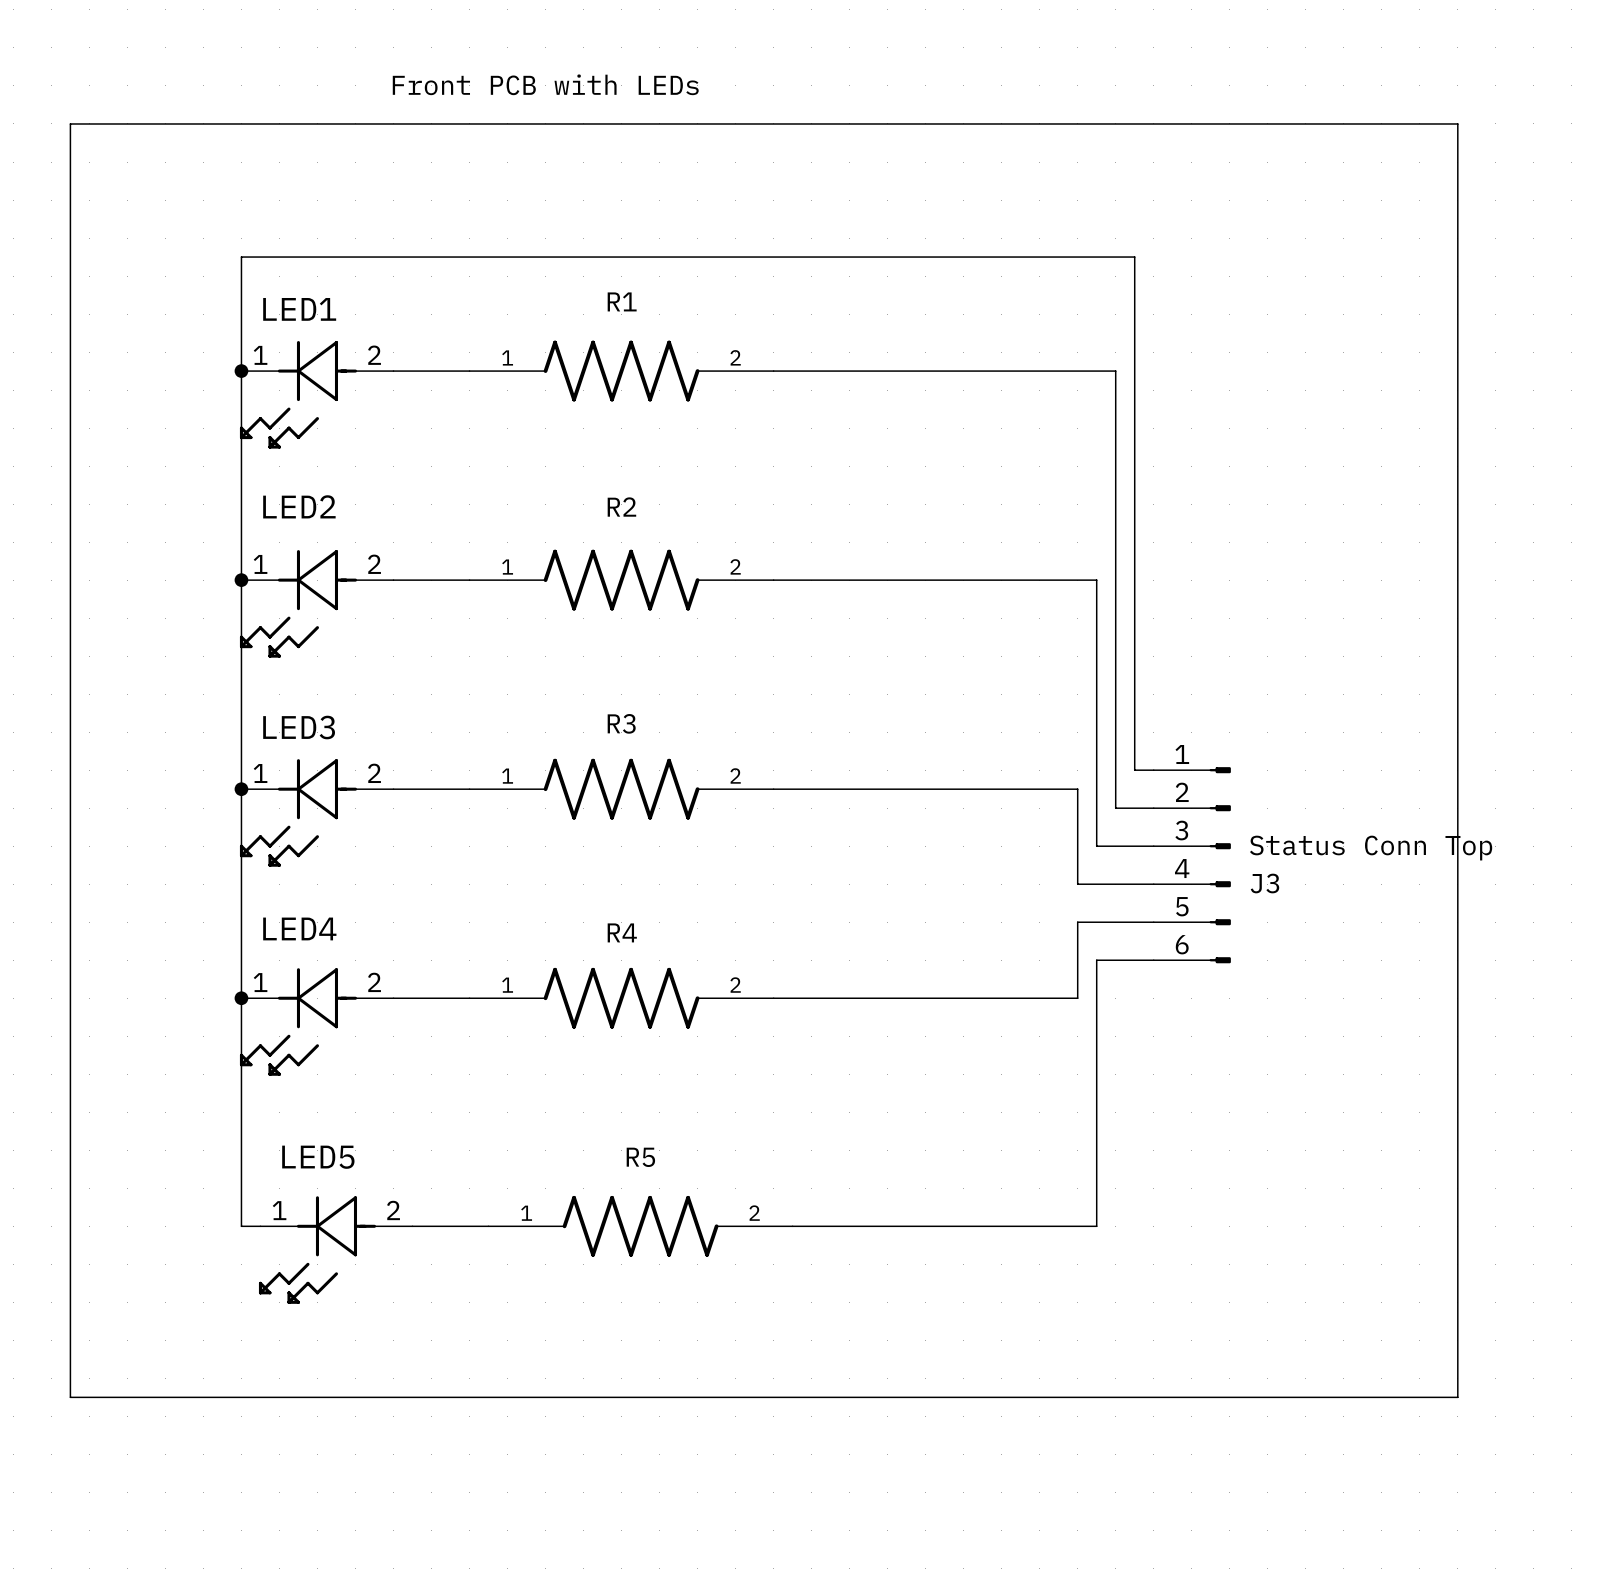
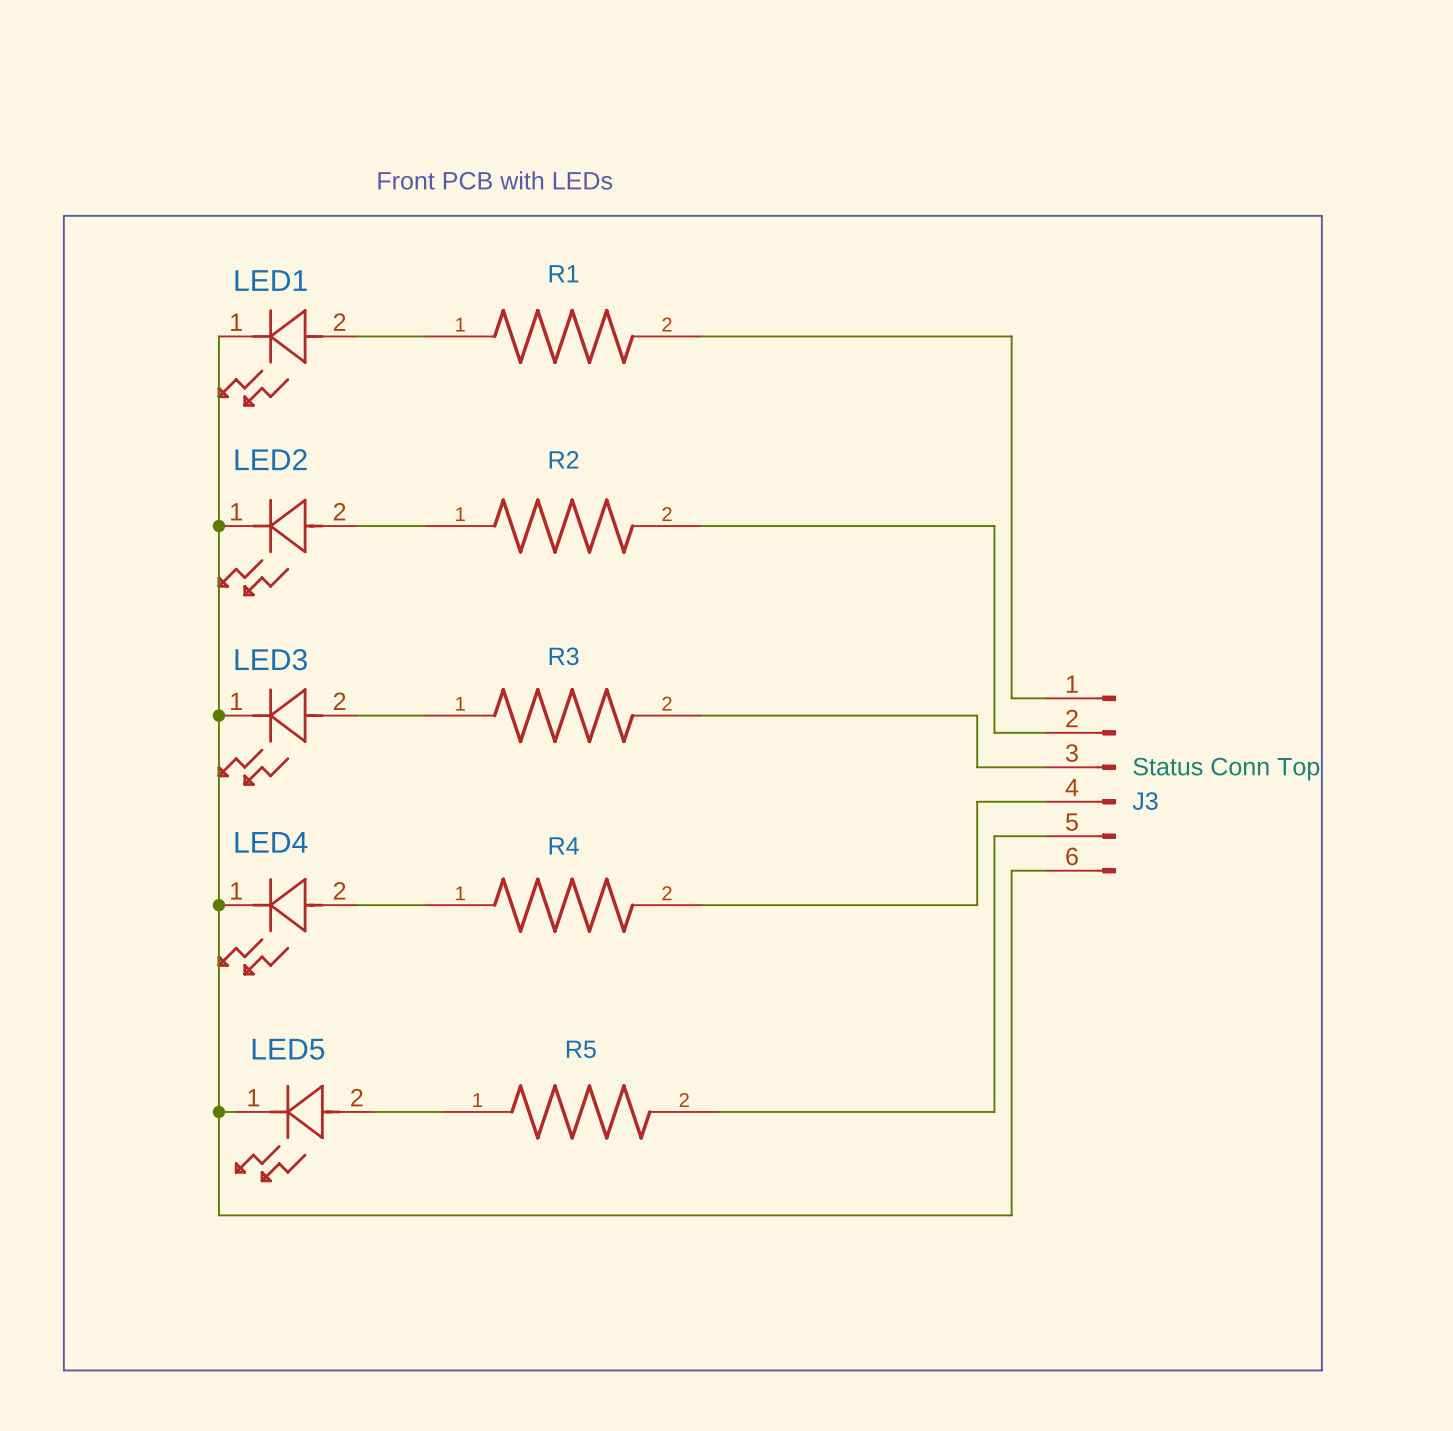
text position: Front PCB with LEDs (545, 84) -> Front PCB with LEDs (495, 180)
line: (70, 238) (70, 123) (1457, 123) (1457, 238) -> (63, 215) (1321, 215)
wire: (241, 371) (241, 257) (1134, 257) (1134, 770) -> none
junction: (241, 371) -> none
wire: (1115, 770) (1115, 808) -> (1011, 698) (1028, 698)
wire: (1096, 808) (1096, 846) -> (977, 767) (994, 767)
wire: none -> (994, 732) (1011, 732)
wire: (1077, 846) (1077, 884) -> (977, 836) (977, 801)
wire: (1077, 922) (1096, 922) -> (994, 870) (994, 836)
wire: (1096, 960) (1115, 960) -> (218, 1111) (218, 1215) (1011, 1215) (1011, 870)
junction: none -> (218, 1111)
line: (70, 1397) (1457, 1397) -> (63, 1267) (63, 1370) (1321, 1370) (1321, 1267)

